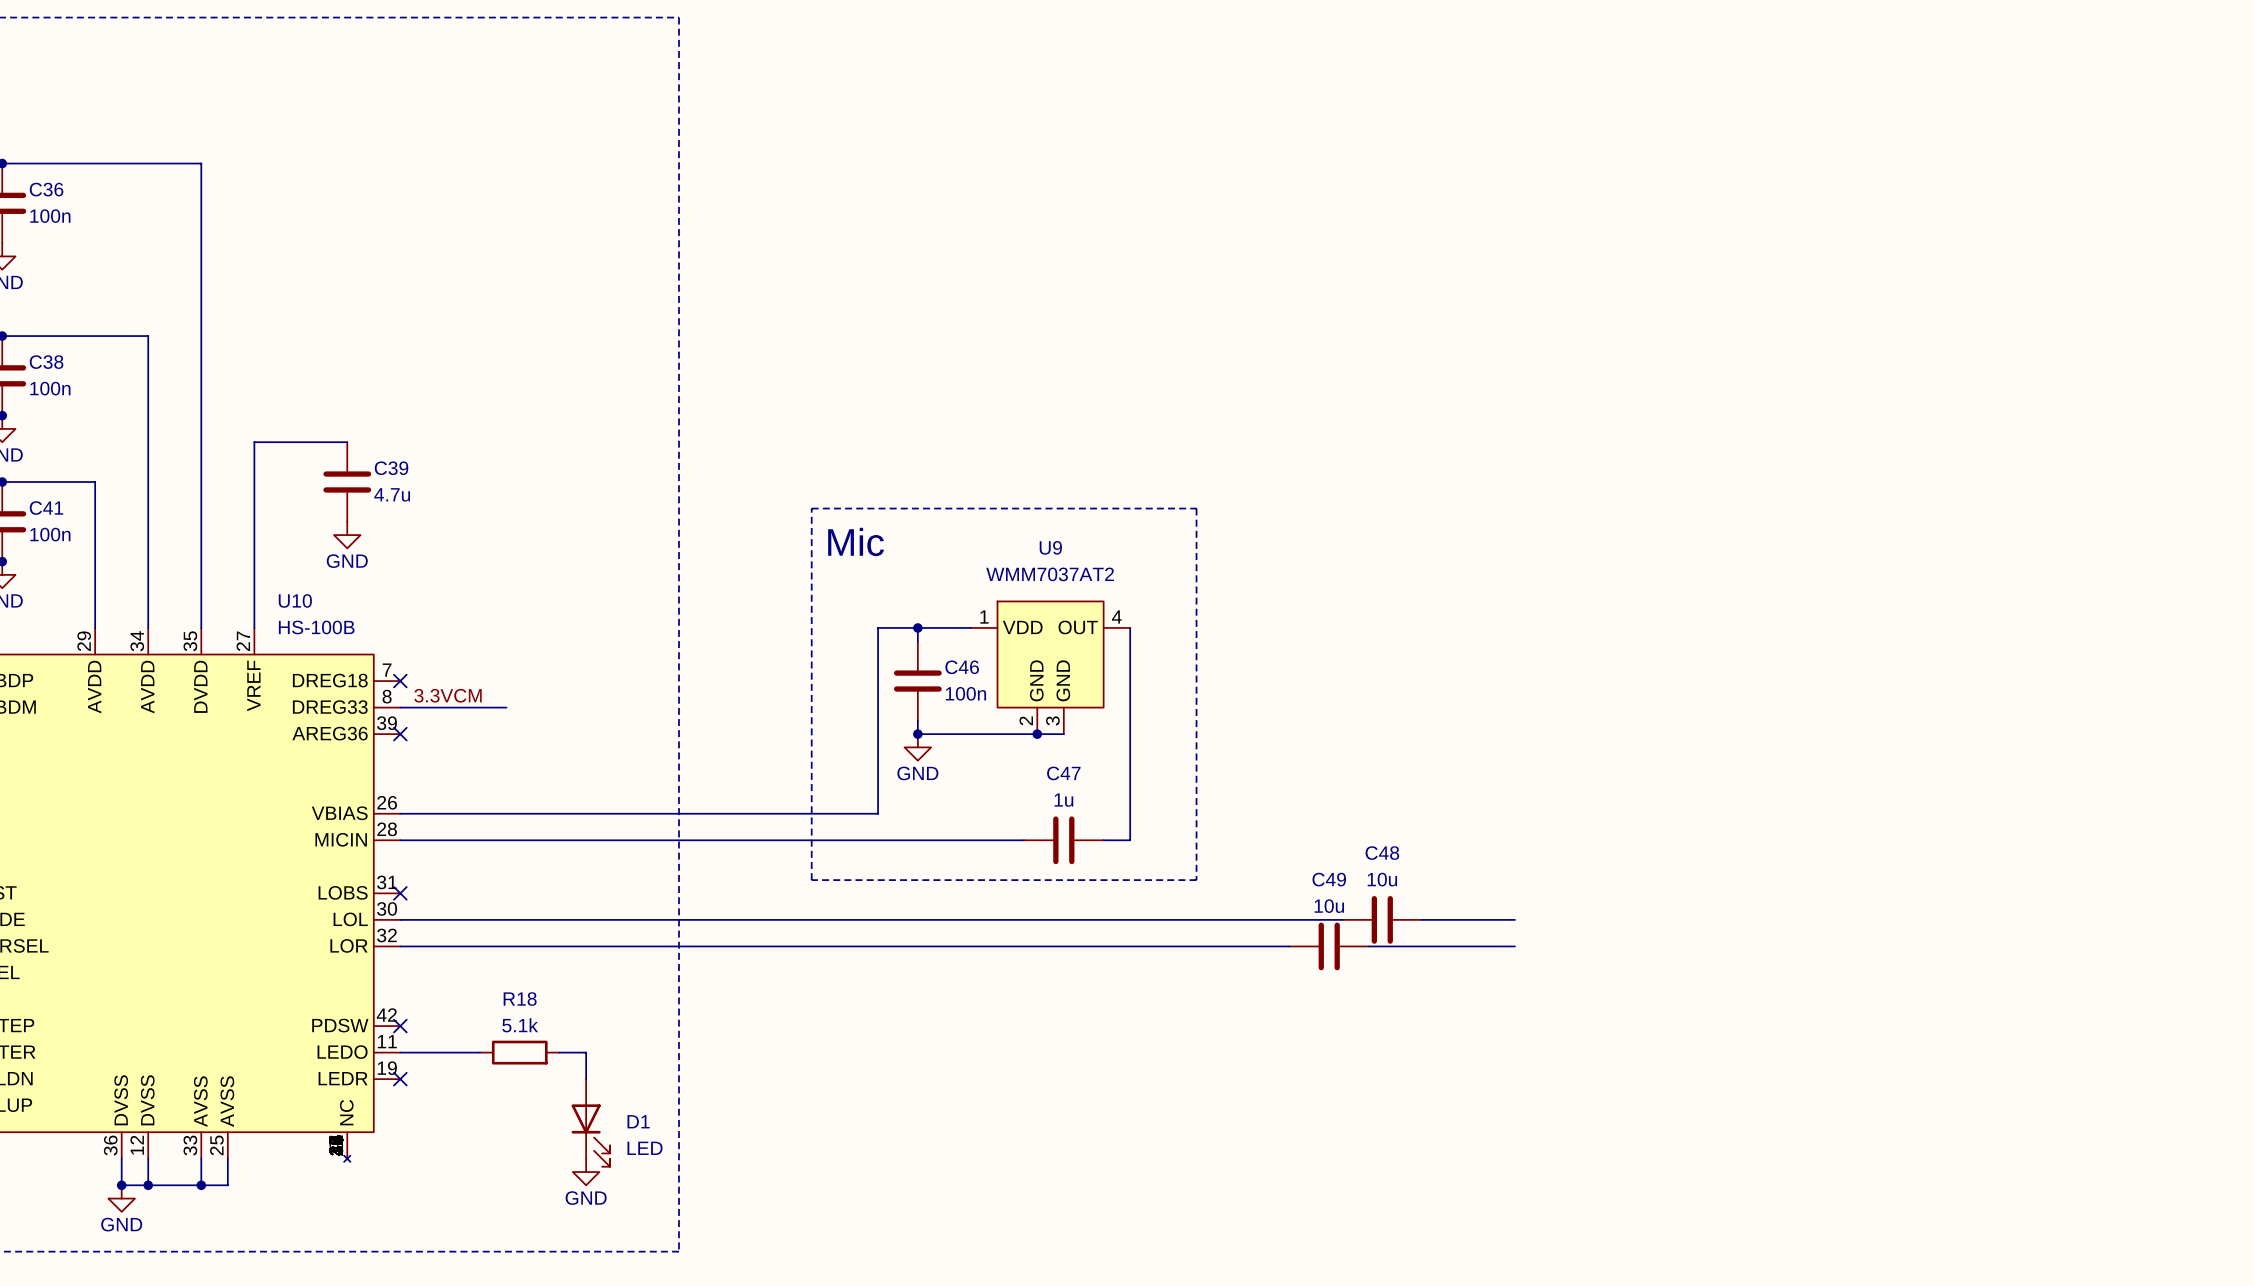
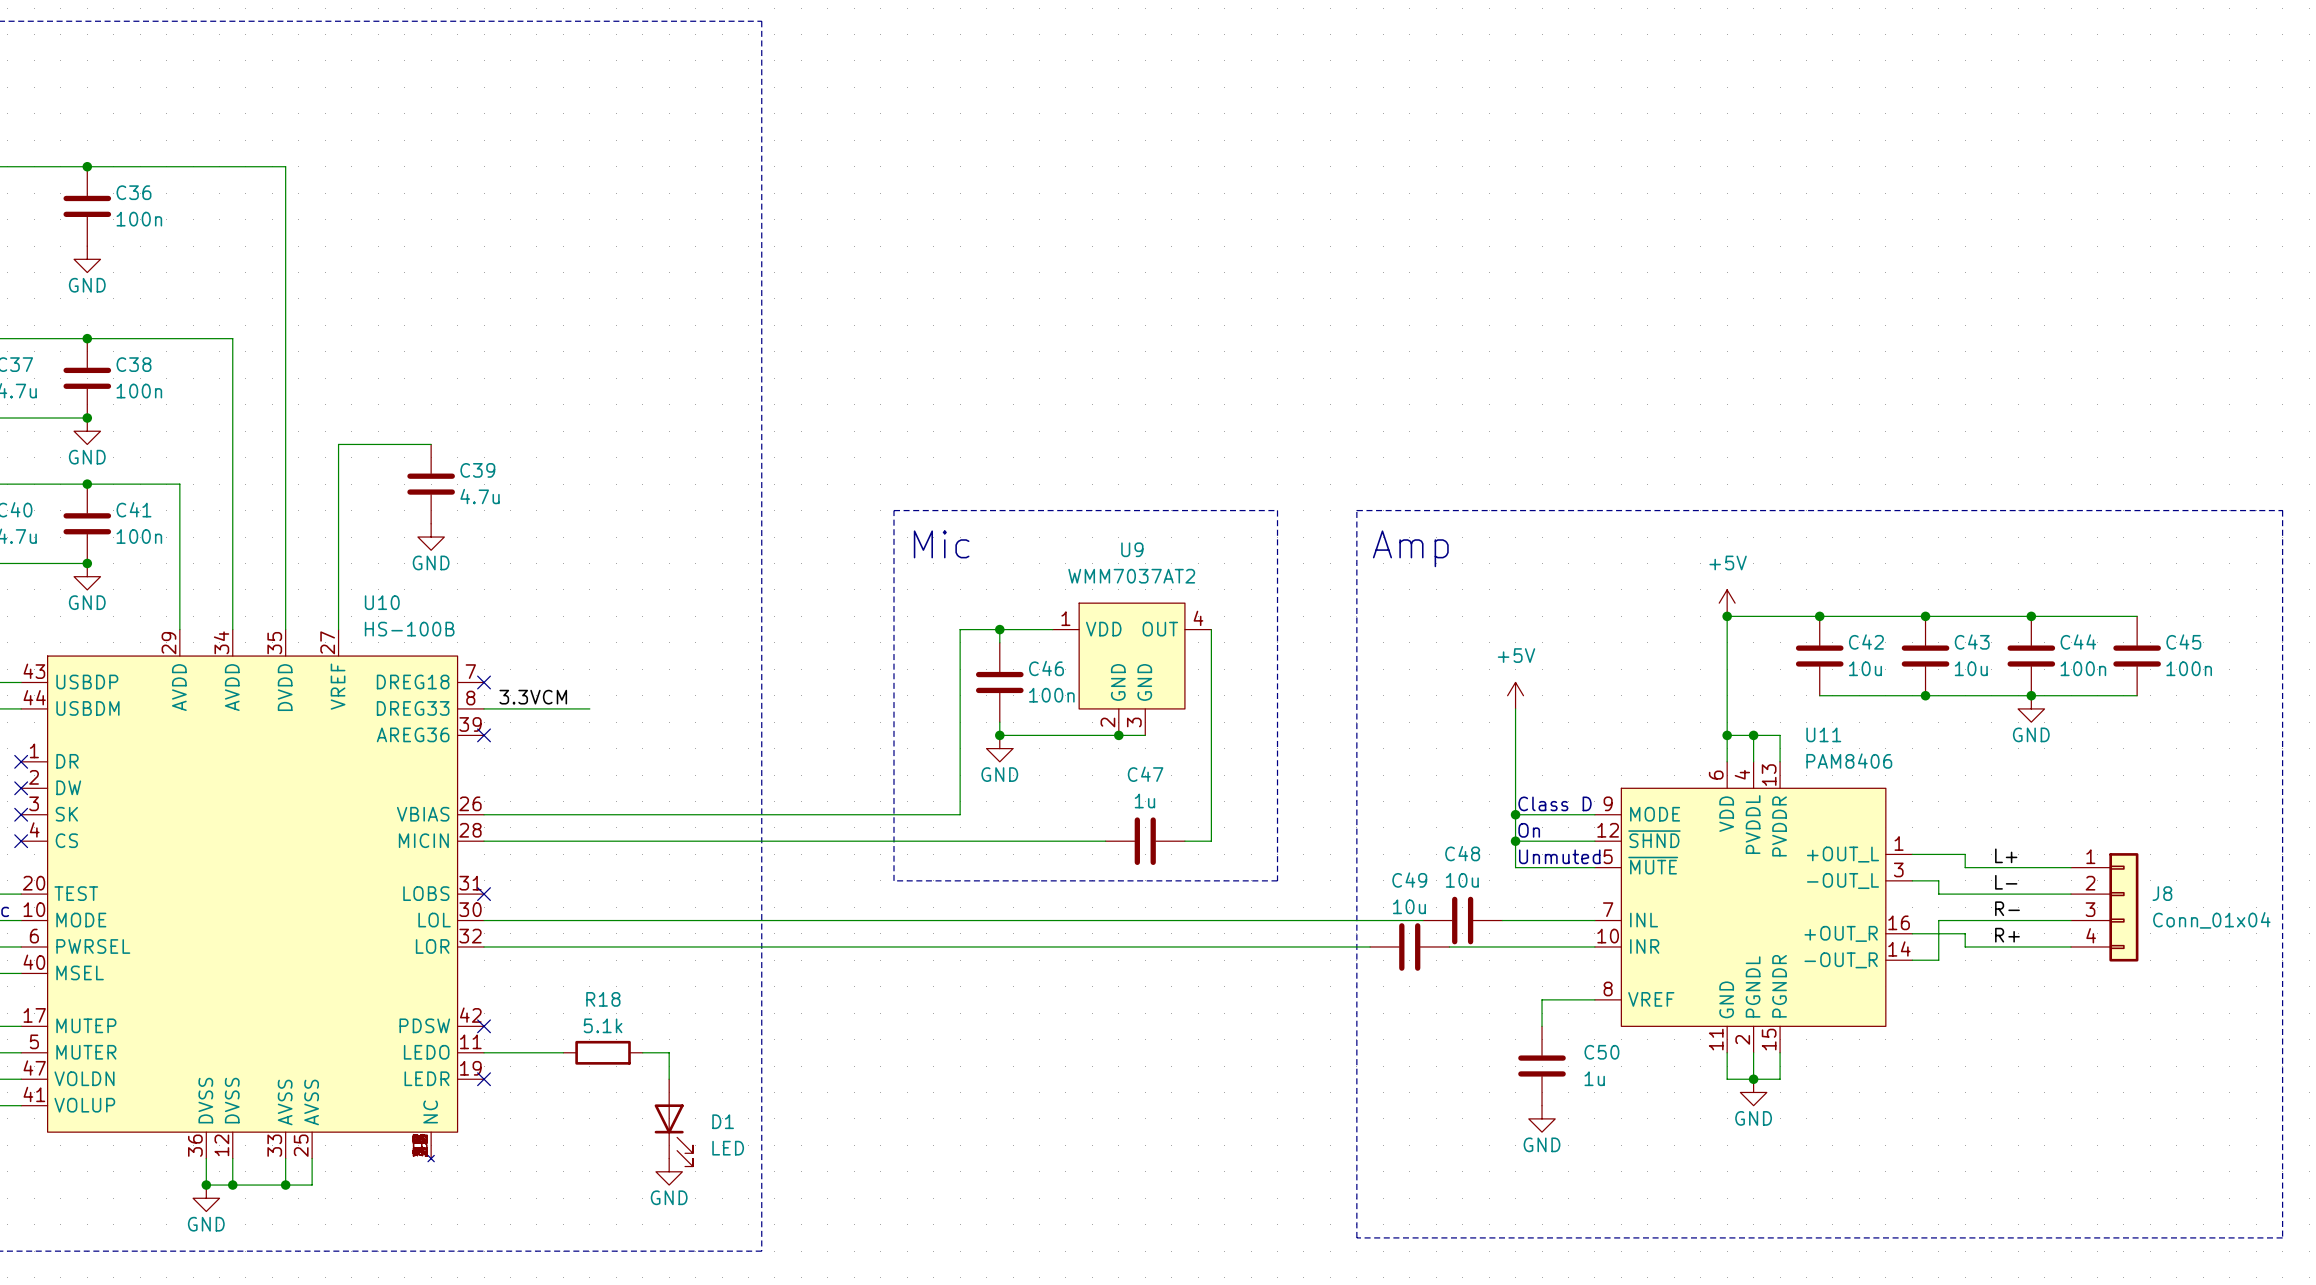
line: none -> (1356, 510) (2282, 510) (2282, 1237) (1356, 1237) (1356, 510)
text: none -> Amp (1410, 548)
power symbol: none -> +5V (1727, 603)
junction: none -> (1727, 616)
junction: none -> (1819, 616)
junction: none -> (1925, 616)
junction: none -> (2031, 616)
wire: none -> (2137, 616) (1727, 616) (1727, 761)
C42: none -> 10u (1819, 656)
C43: none -> 10u (1925, 656)
C44: none -> 100n (2031, 656)
C45: none -> 100n (2137, 656)
power symbol: none -> +5V (1515, 695)
wire: none -> (1819, 695) (2137, 695)
junction: none -> (1925, 695)
junction: none -> (2031, 695)
wire: none -> (1515, 708) (1515, 867) (1594, 867)
power symbol: none -> GND (2031, 708)
wire: none -> (1727, 735) (1780, 735) (1780, 761)
junction: none -> (1727, 735)
wire: none -> (1753, 735) (1753, 761)
junction: none -> (1753, 735)
text: none -> Class D (1555, 803)
wire: none -> (1515, 814) (1594, 814)
junction: none -> (1515, 814)
text: none -> On (1529, 830)
wire: none -> (1515, 841) (1594, 841)
junction: none -> (1515, 841)
wire: none -> (1912, 854) (1965, 854) (1965, 867) (2071, 867)
label: none -> L+ (2006, 855)
text: none -> Unmuted (1559, 856)
wire: none -> (1912, 880) (1938, 880) (1938, 894) (2071, 894)
label: none -> L- (2006, 882)
U11: none -> PAM8406 (1753, 907)
J8: none -> Conn_01x04 (2104, 907)
label: none -> R- (2007, 908)
wire: none -> (2071, 920) (1938, 920) (1938, 960) (1912, 960)
wire: none -> (1912, 933) (1965, 933) (1965, 946) (2071, 946)
label: none -> R+ (2007, 935)
wire: none -> (1594, 999) (1542, 999) (1542, 1026)
wire: none -> (1727, 1052) (1727, 1079) (1780, 1079) (1780, 1052)
wire: none -> (1753, 1052) (1753, 1079)
C50: none -> 1u (1542, 1066)
junction: none -> (1753, 1079)
power symbol: none -> GND (1753, 1092)
power symbol: none -> GND (1542, 1118)

